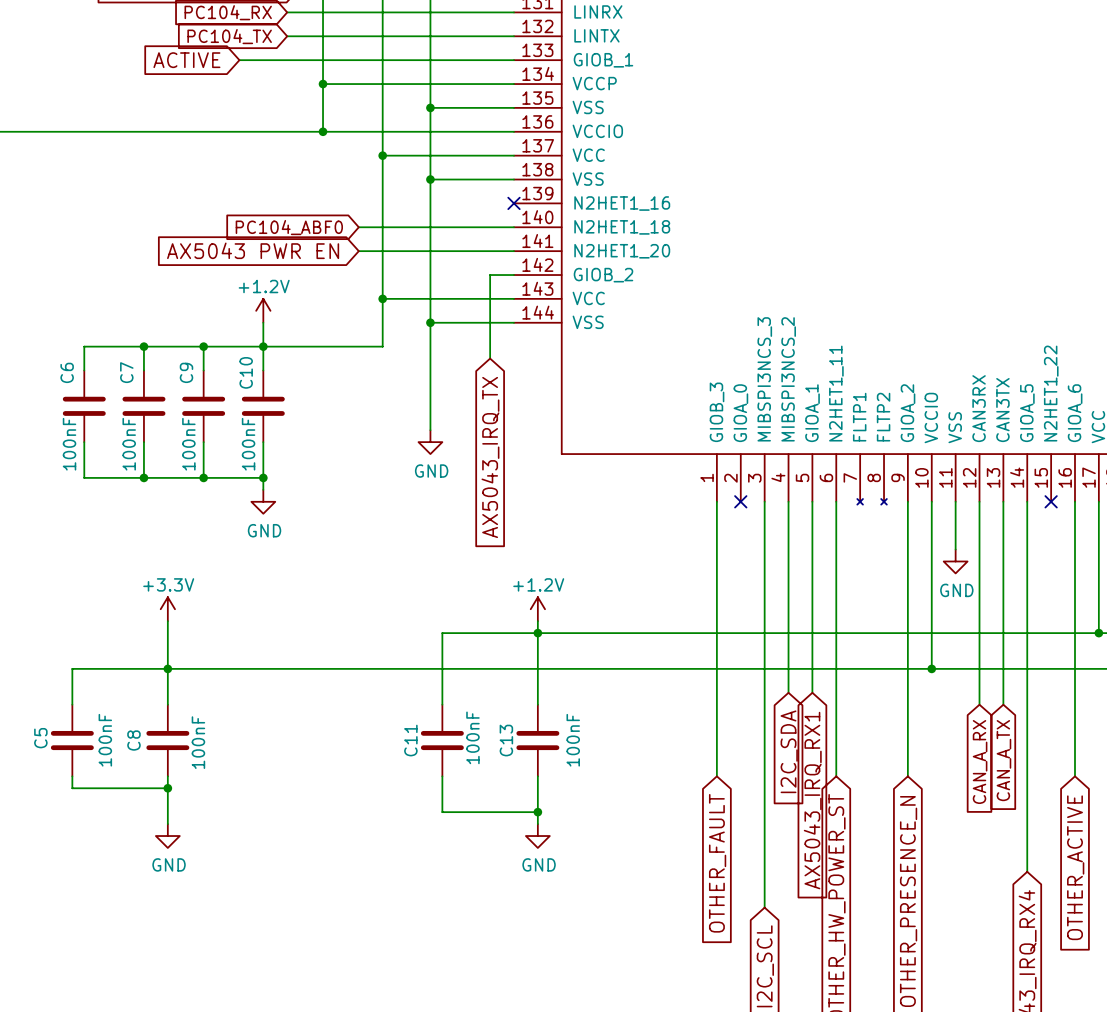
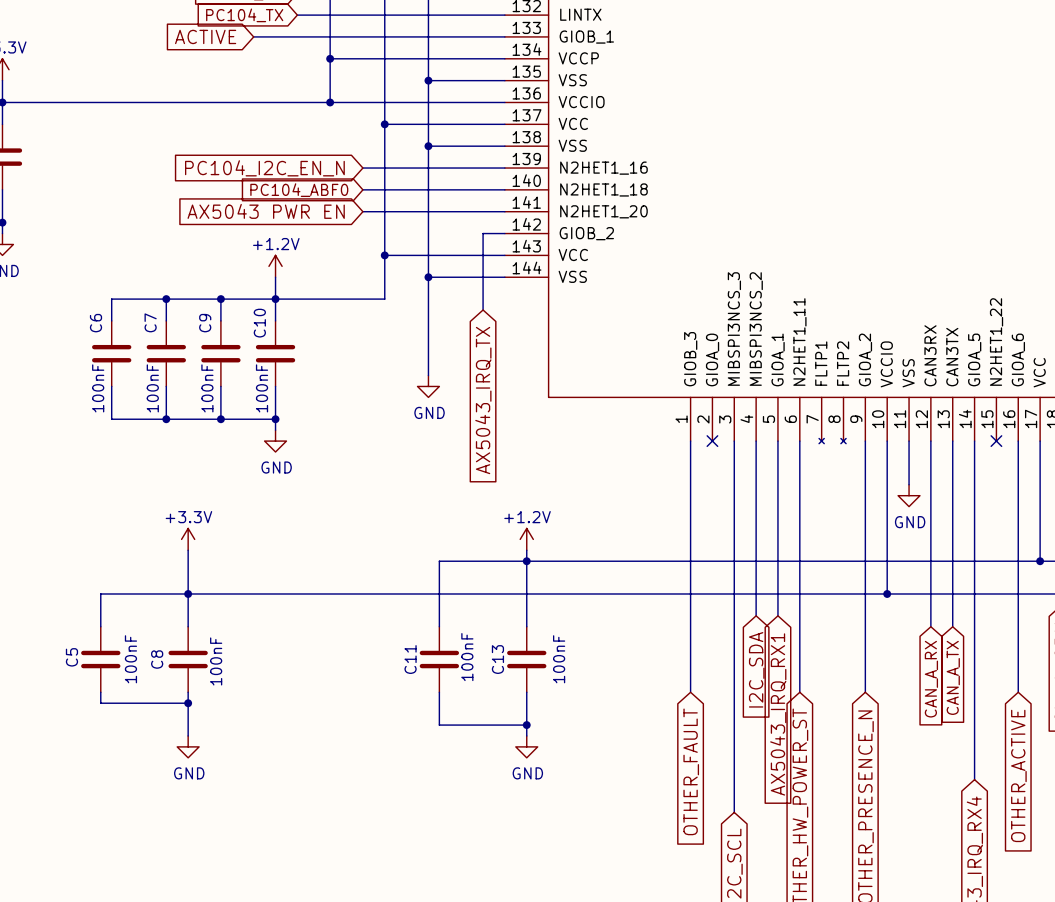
global label: none -> PC104_I2C_EN_N (264, 168)
wire: none -> (362, 168) (504, 168)
no-connect mark: (513, 203) -> none

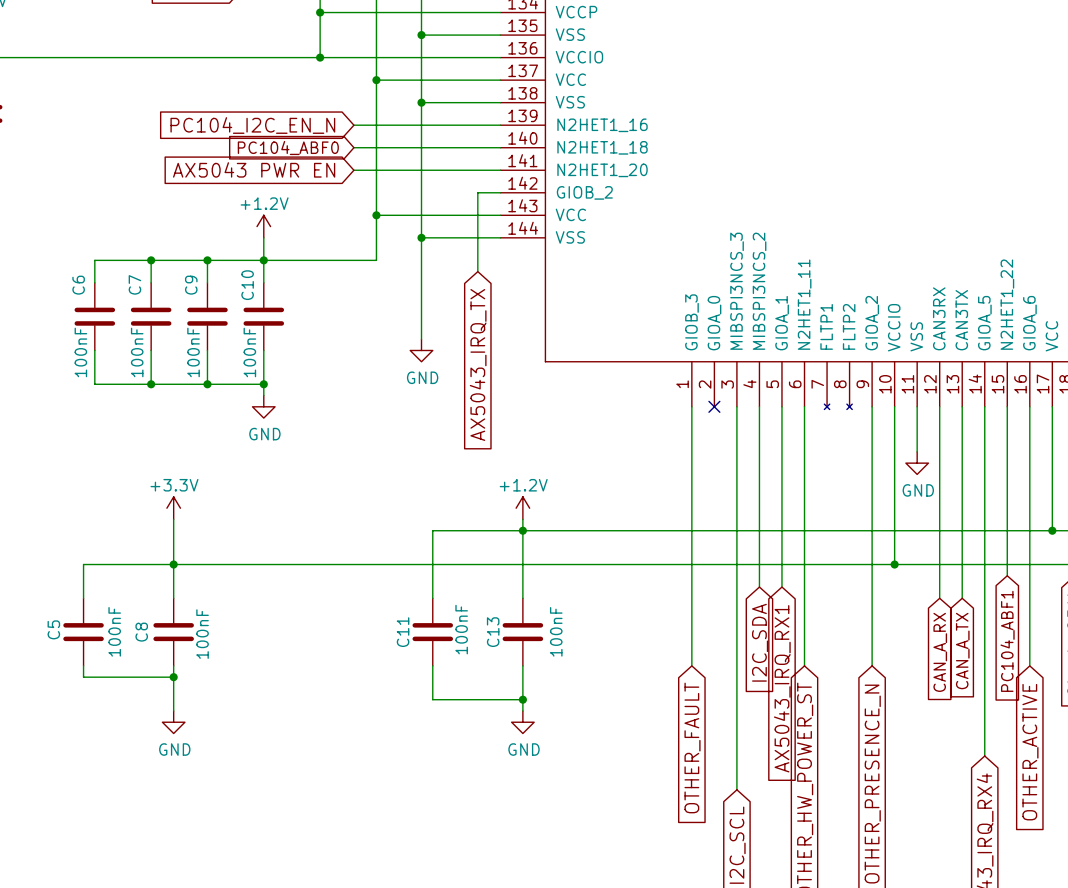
wire: none -> (1007, 406) (1007, 575)
no-connect mark: (996, 441) -> none
global label: none -> PC104_ABF1 (1007, 641)

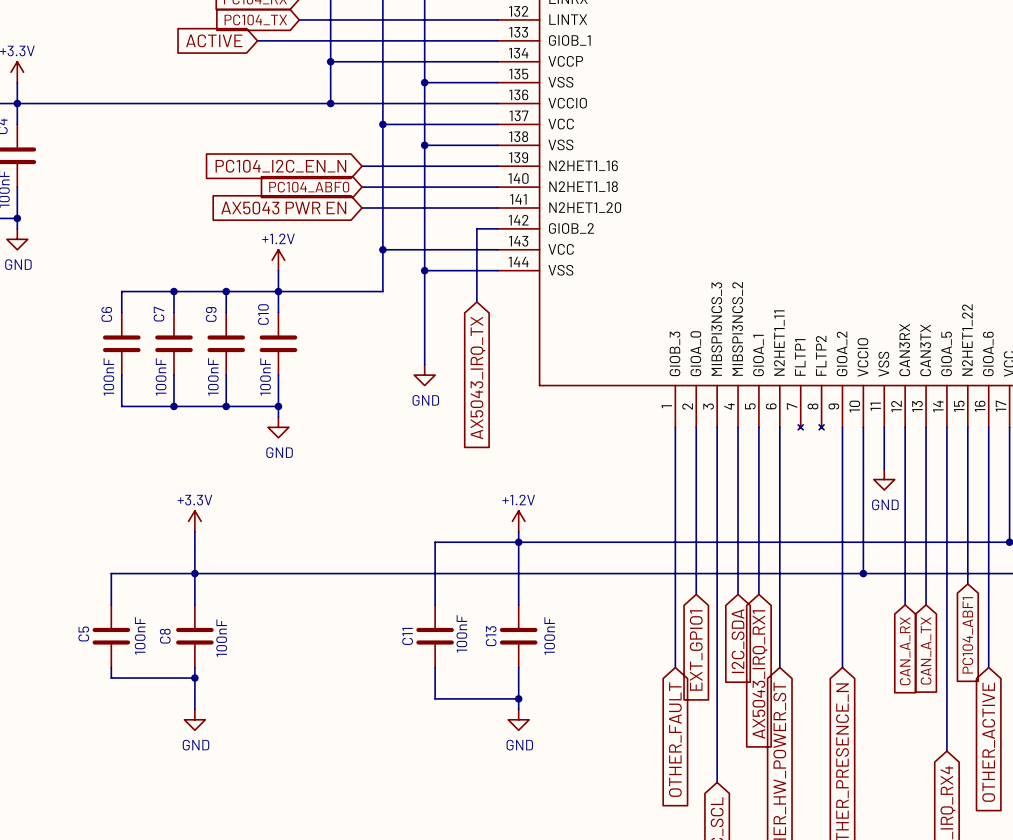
wire: none -> (696, 427) (696, 594)
no-connect mark: (714, 406) -> none
global label: none -> EXT_GPIO1 (696, 650)

